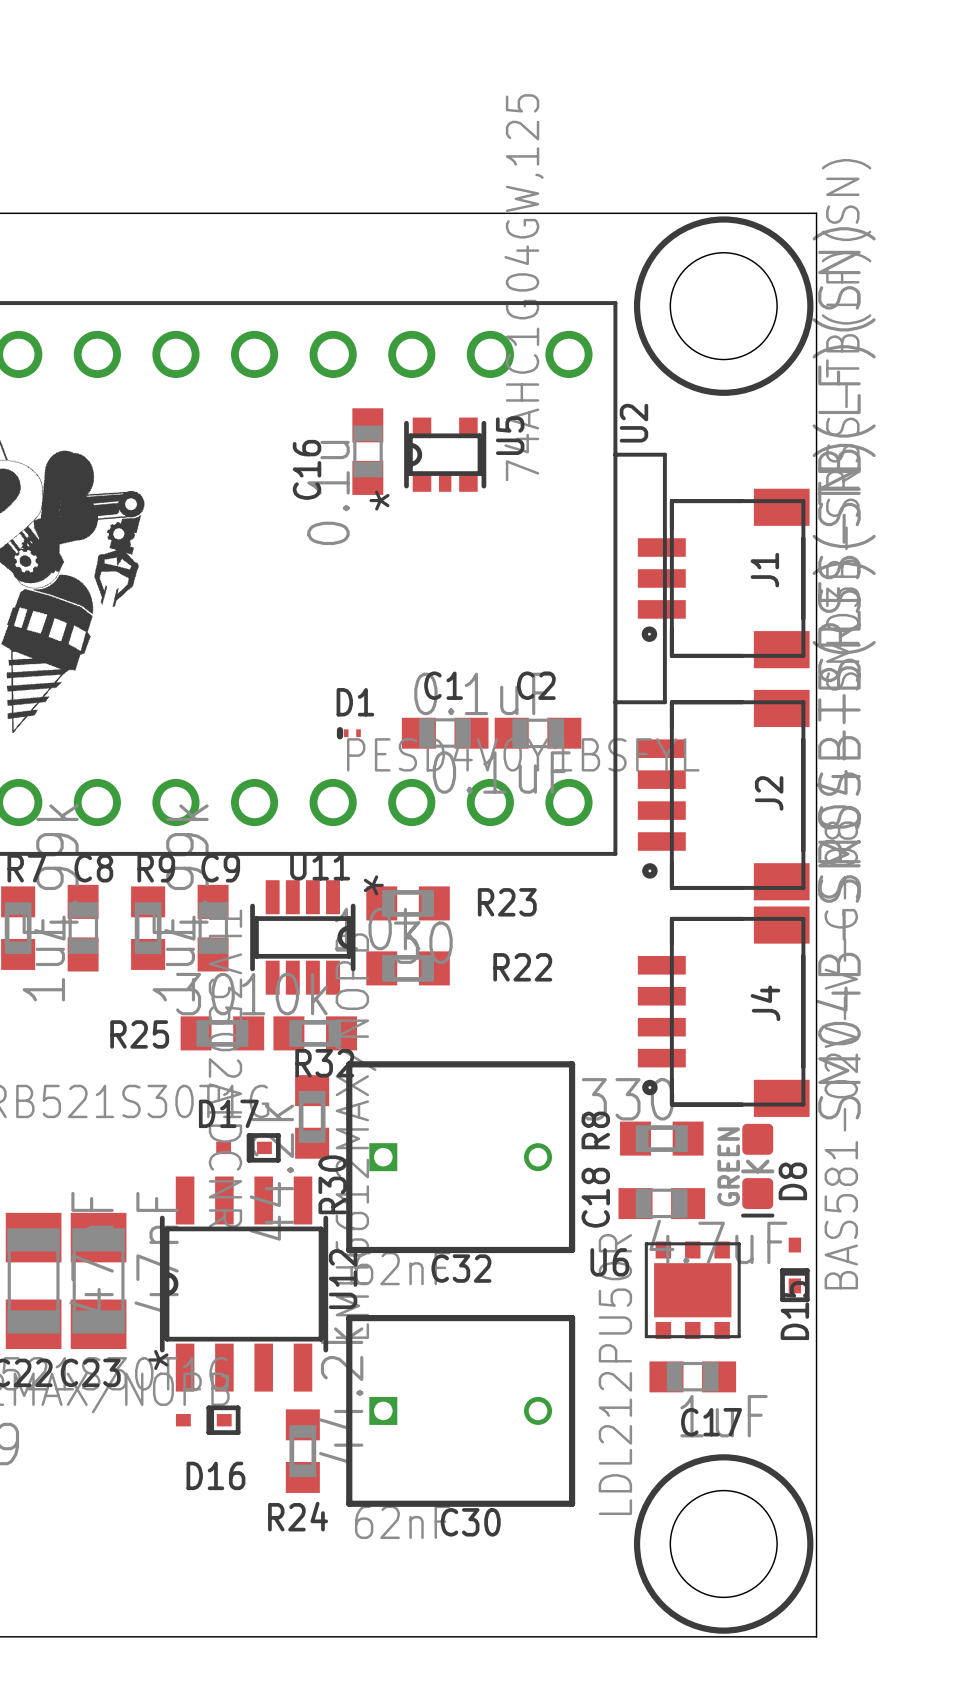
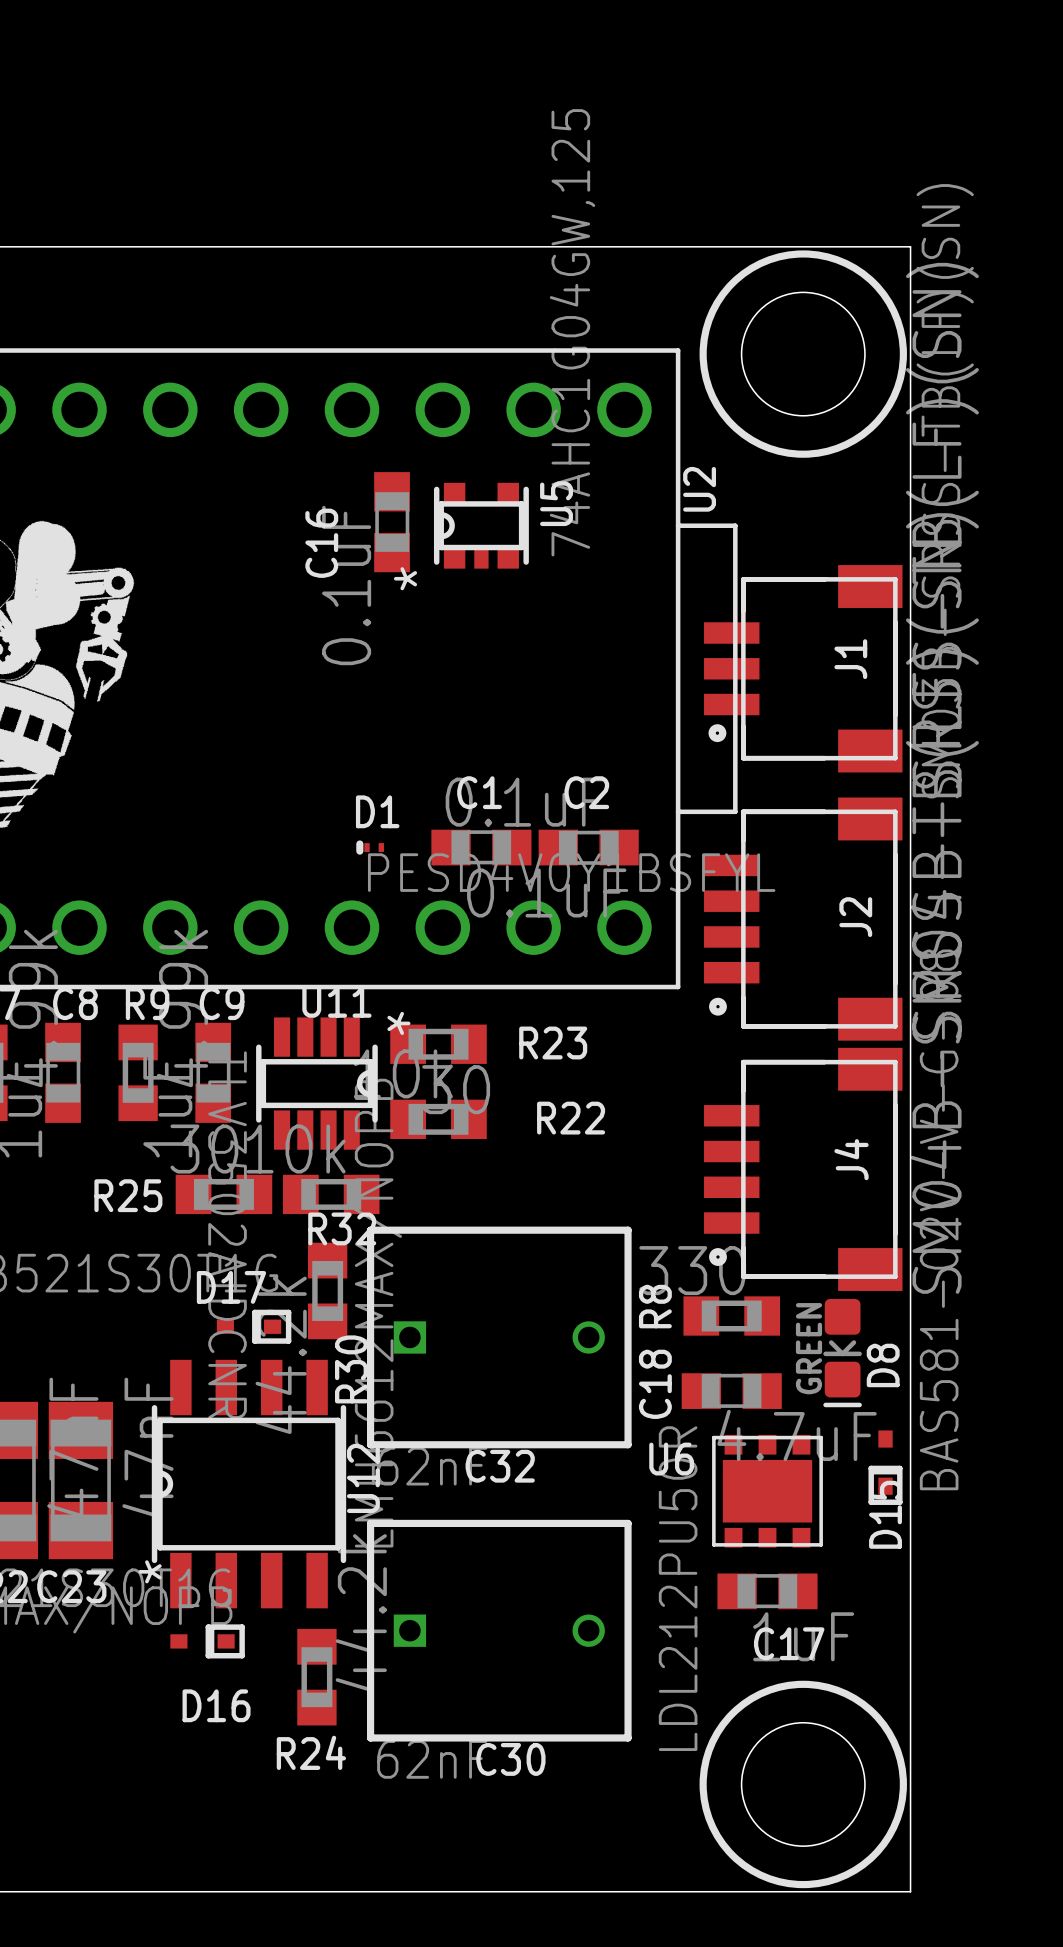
C16 value: 0.1u (328, 492) -> 0.1uF (346, 585)

